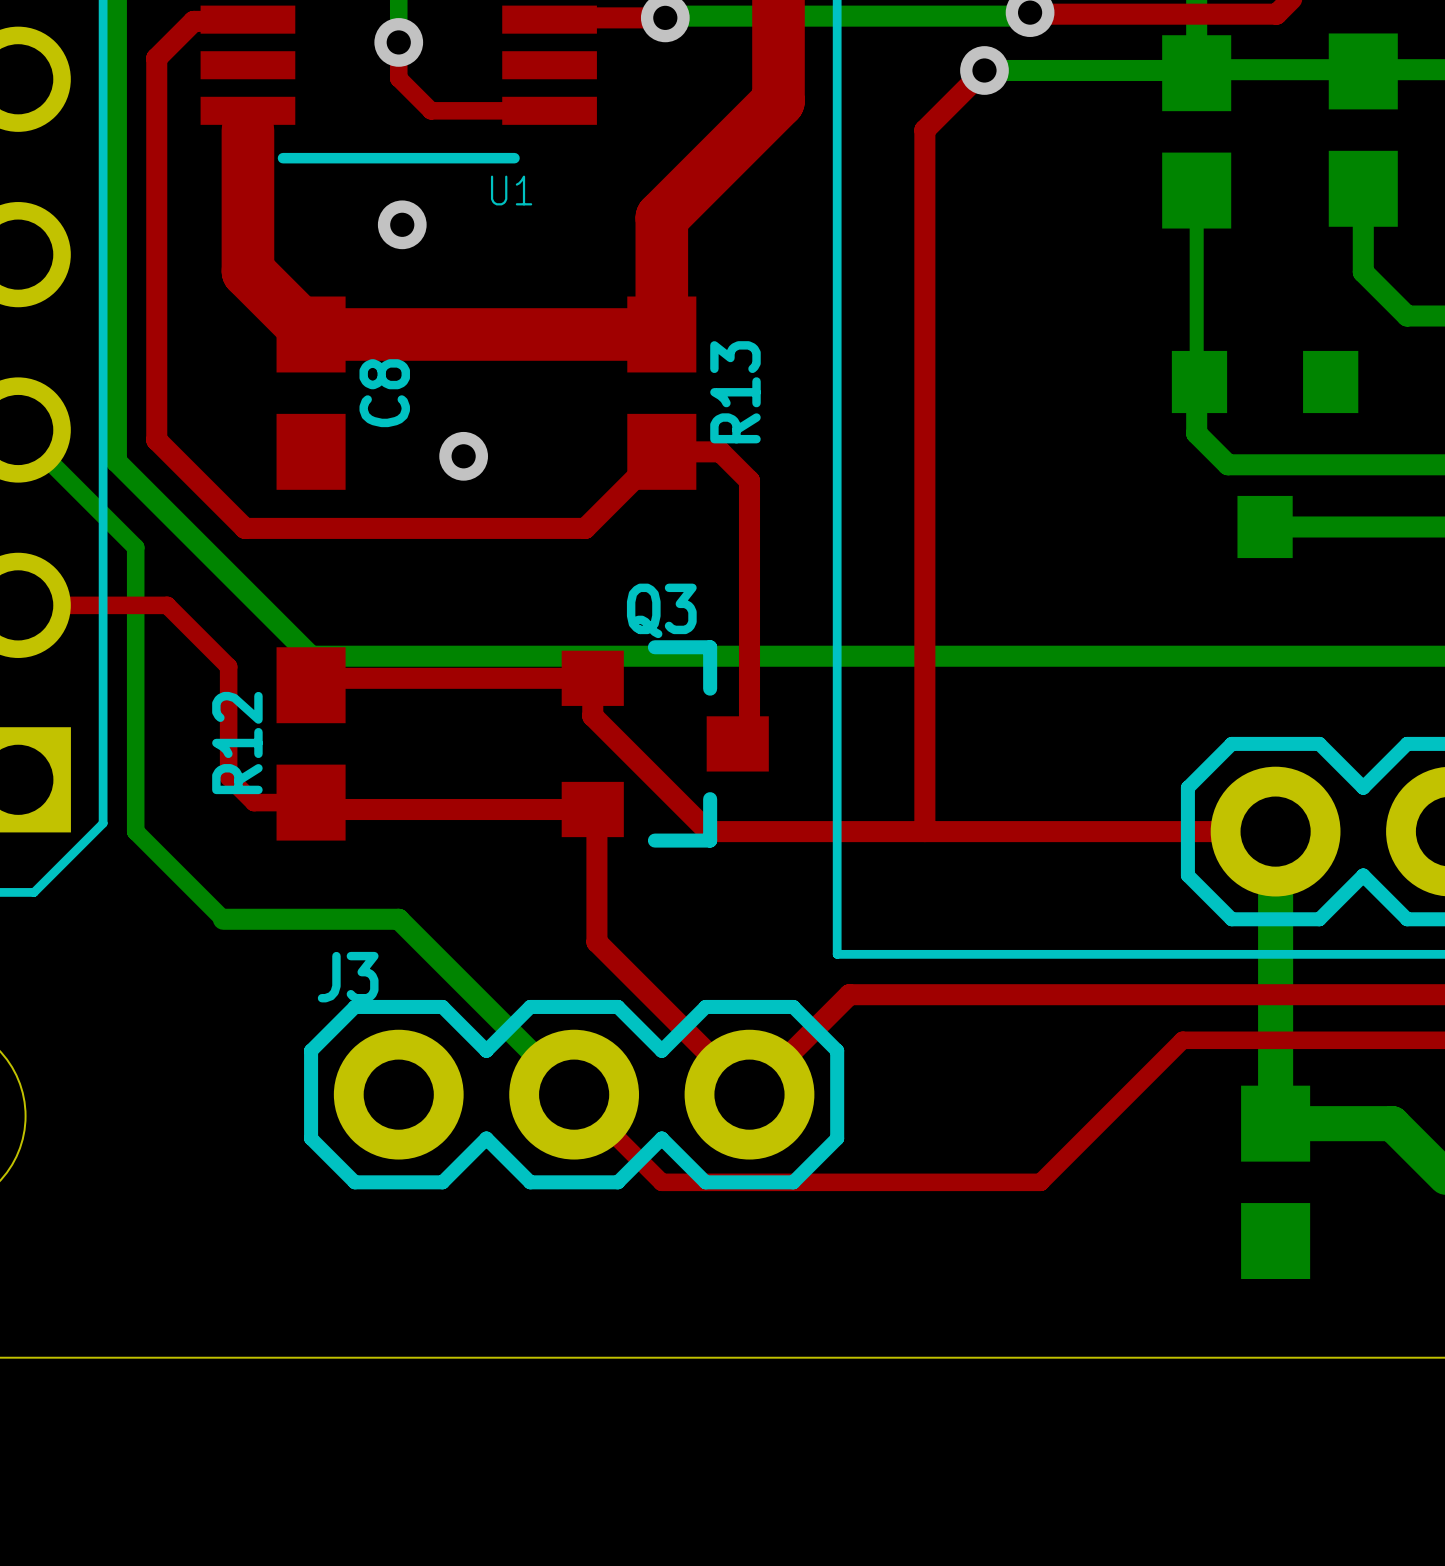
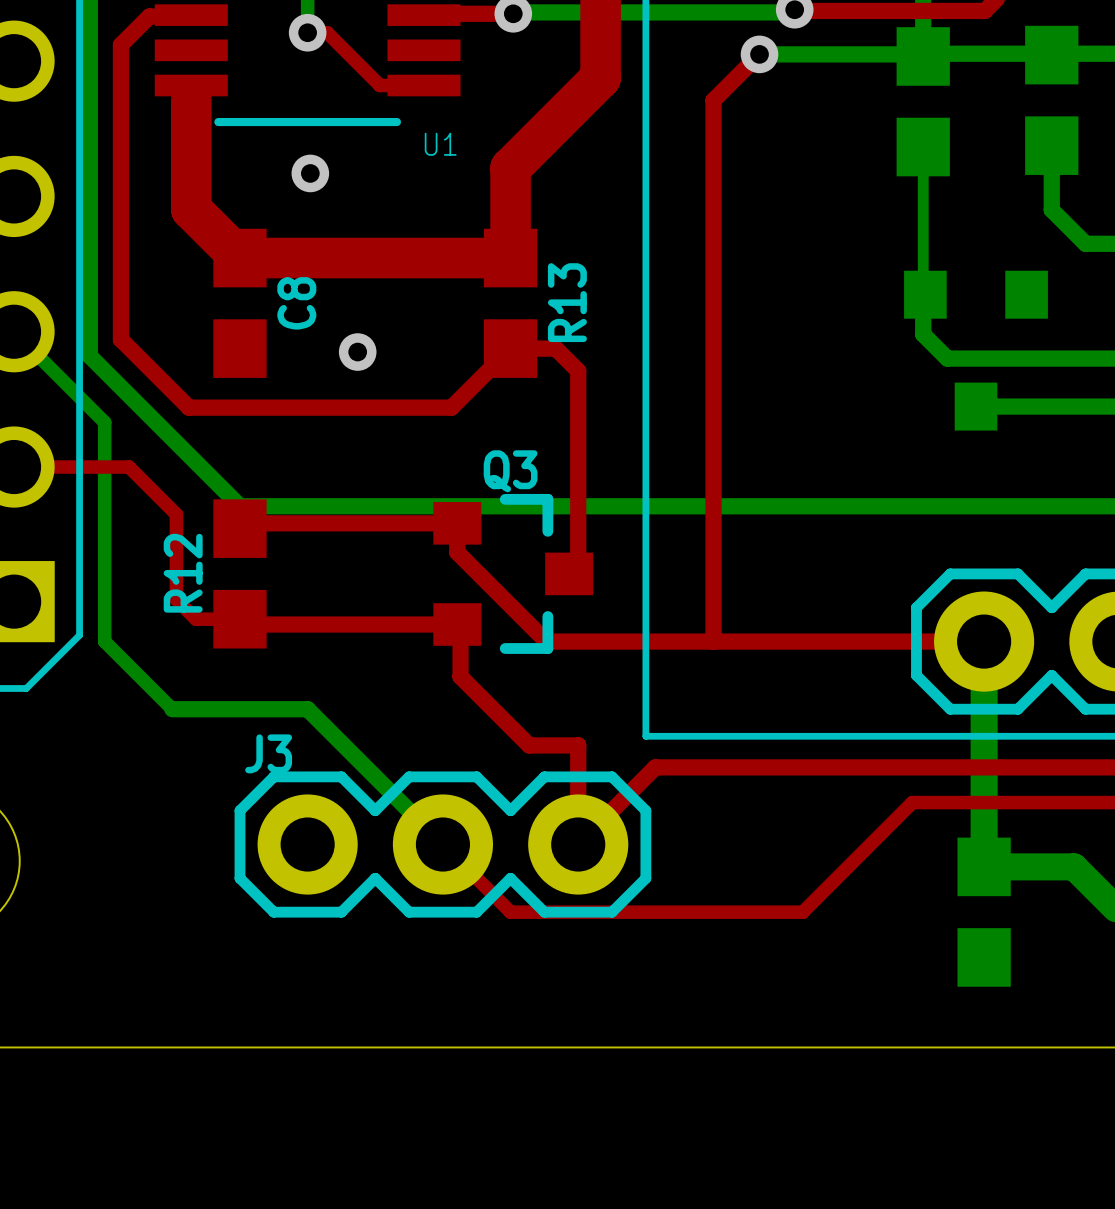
top track: (398, 42) (398, 78) (431, 110) (492, 110) -> (307, 32) (327, 32) (379, 85)
U1 name position: U1 (511, 190) -> U1 (440, 144)
top track: (596, 877) (596, 942) (749, 1094) -> (460, 676) (529, 745) (578, 745) (578, 844)

